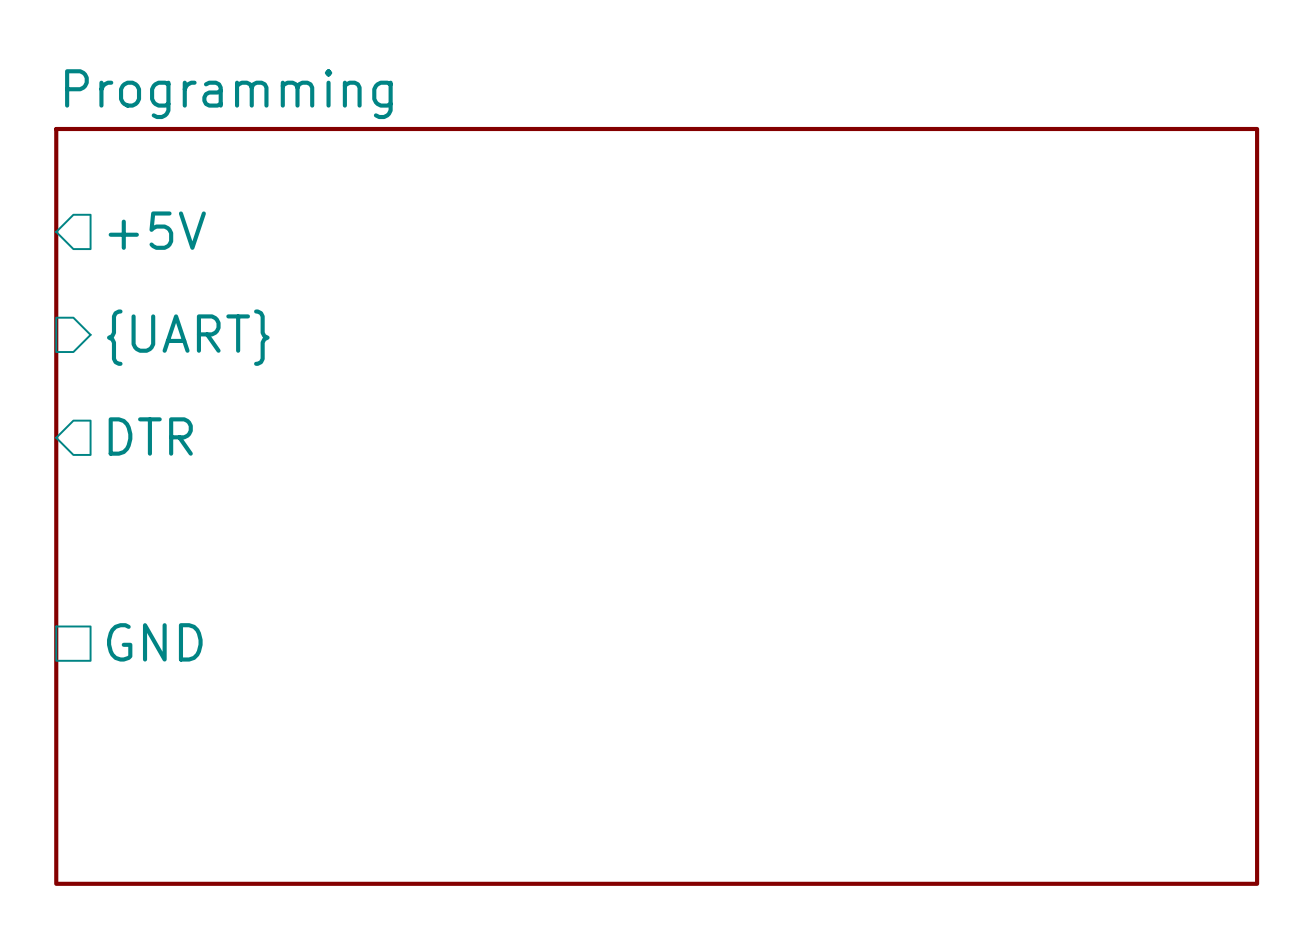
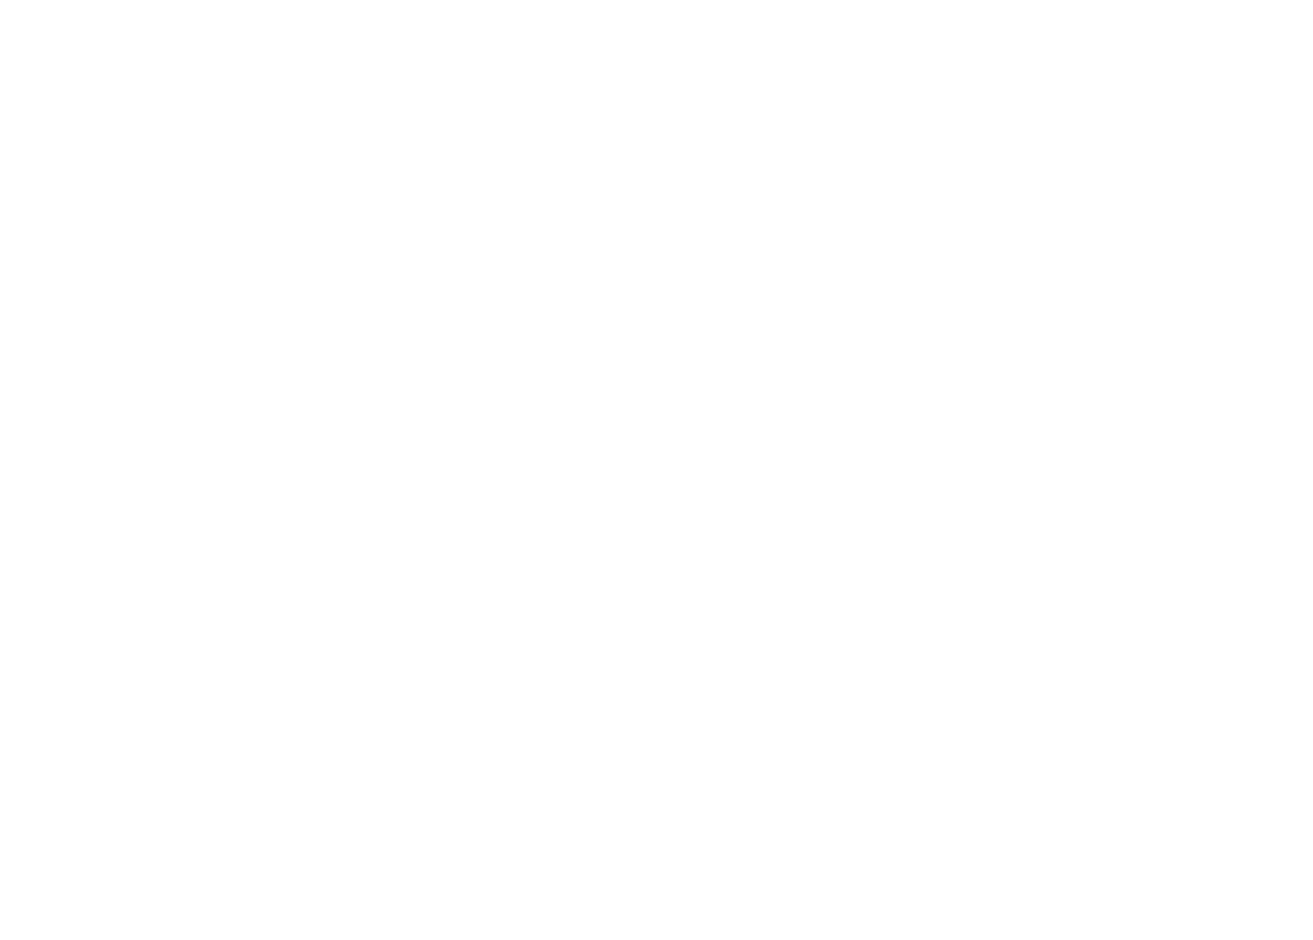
sheet pin: +5V (157, 230) -> none
sheet pin: {UART} (188, 337) -> none
sheet pin: DTR (150, 436) -> none
sheet Programming: (656, 506) -> none
sheet pin: GND (154, 642) -> none

